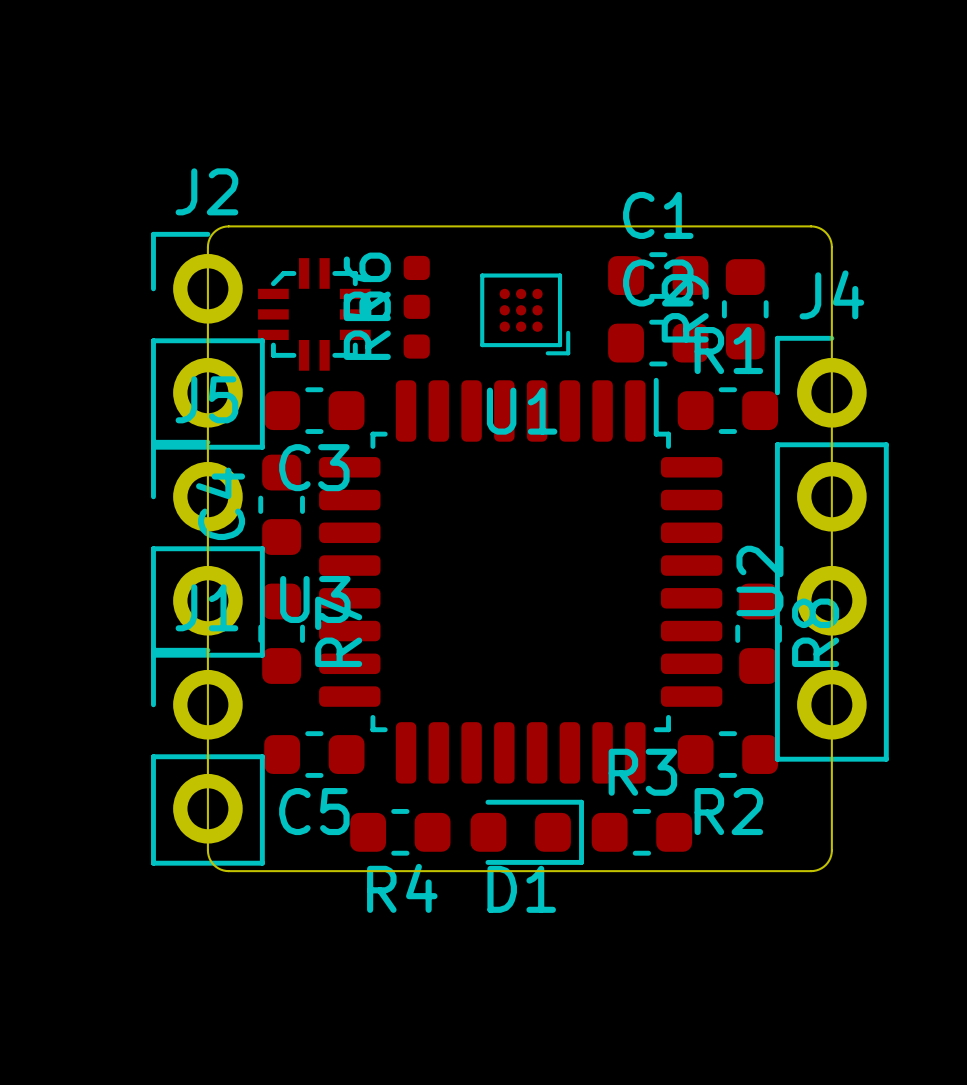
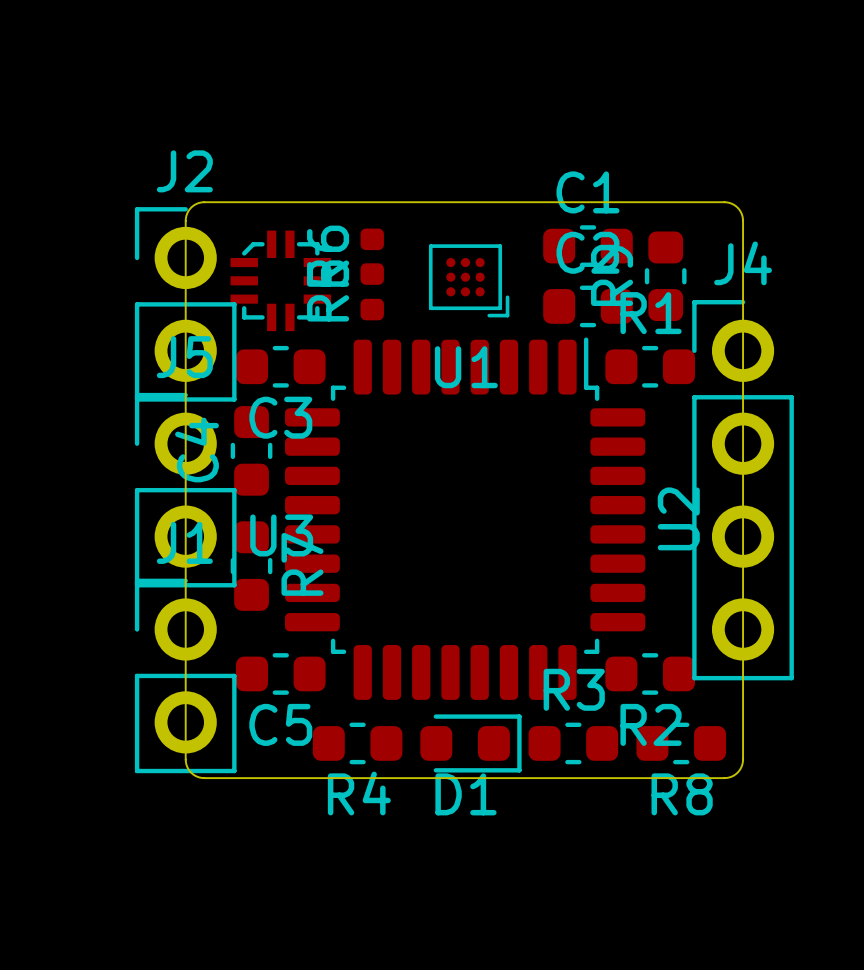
R8 rotation: 0° (758, 633) -> 90° clockwise (681, 743)
R8 position: (758, 633) -> (681, 743)

